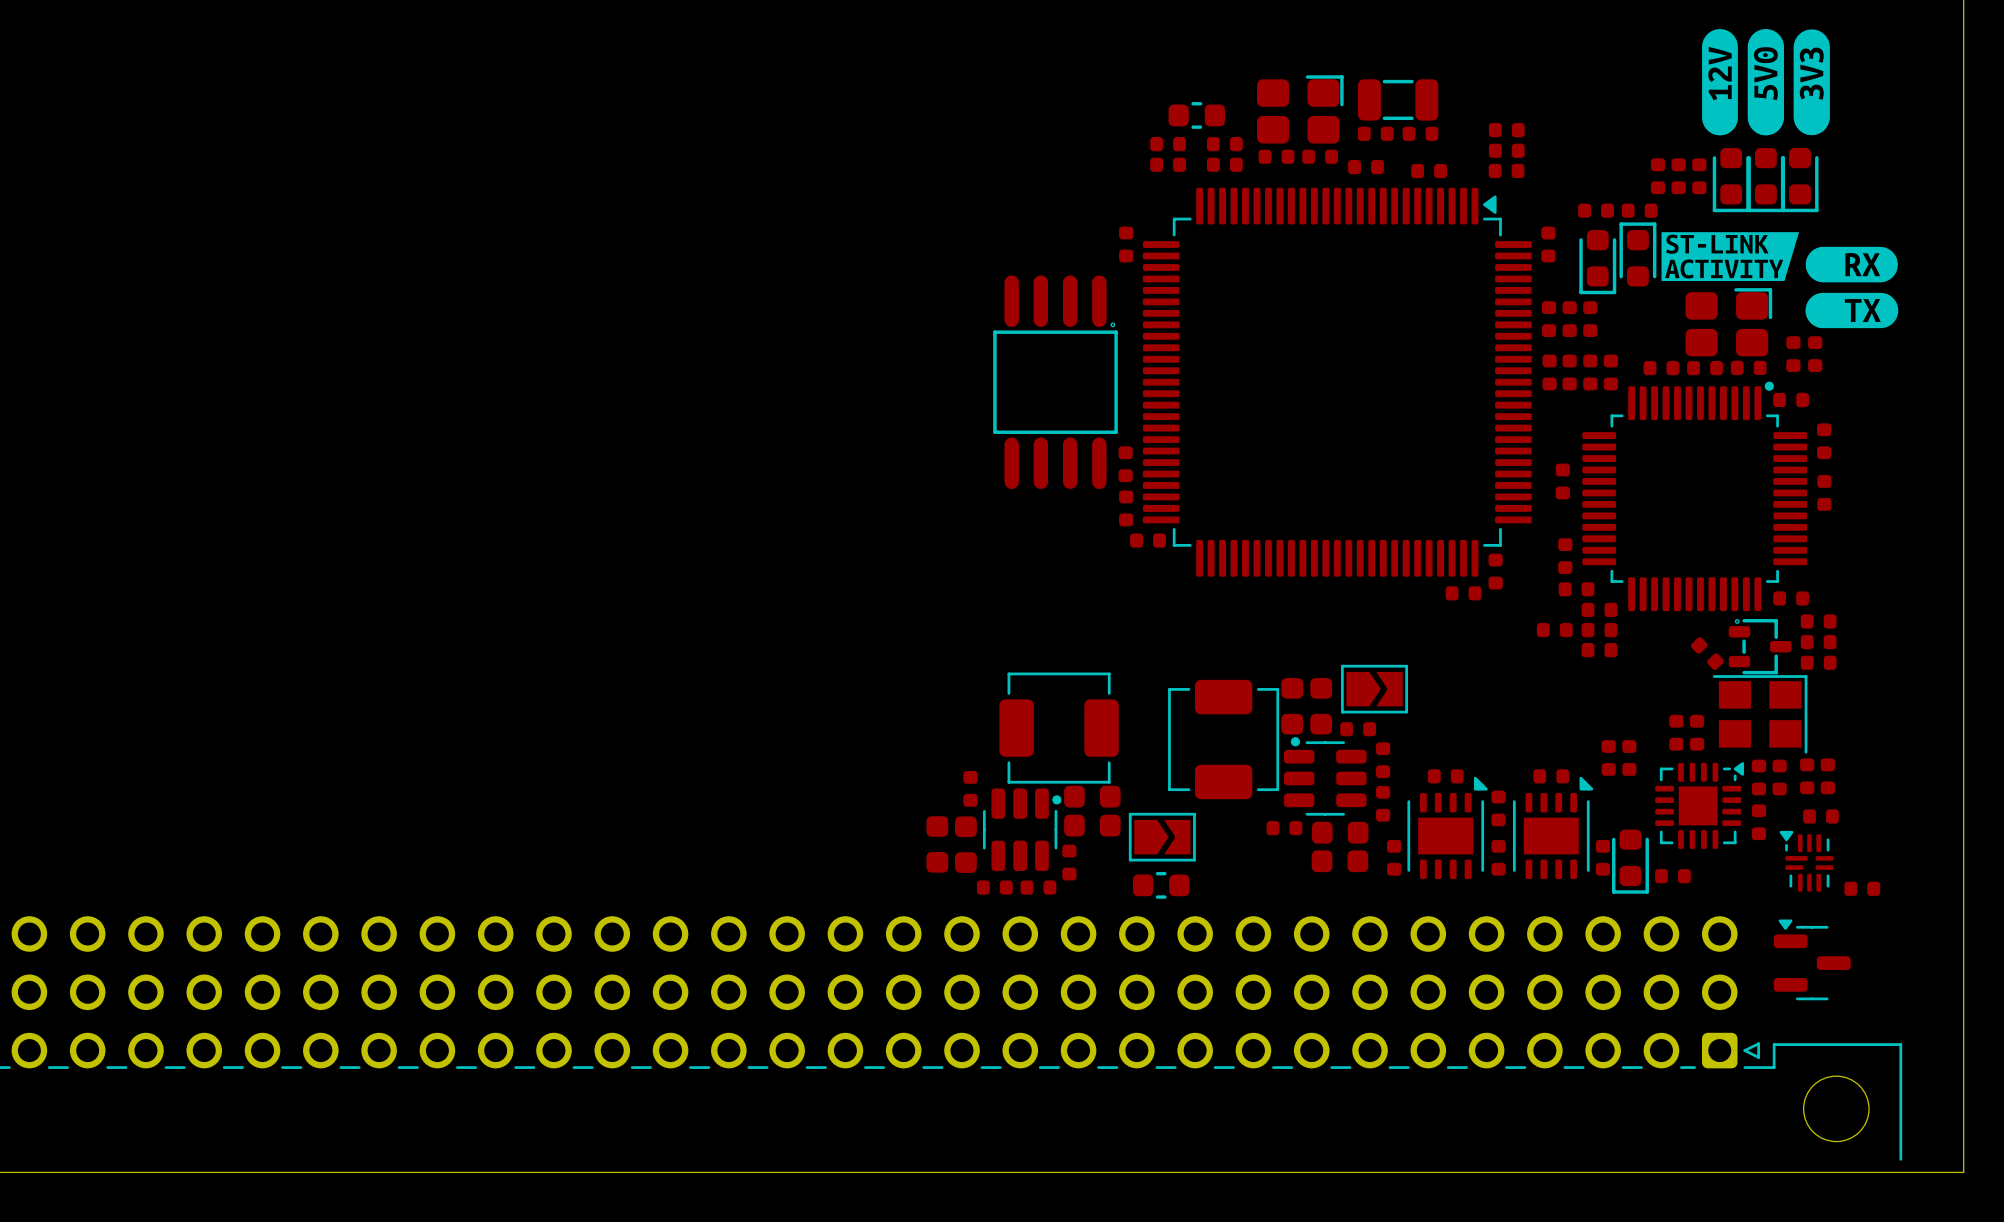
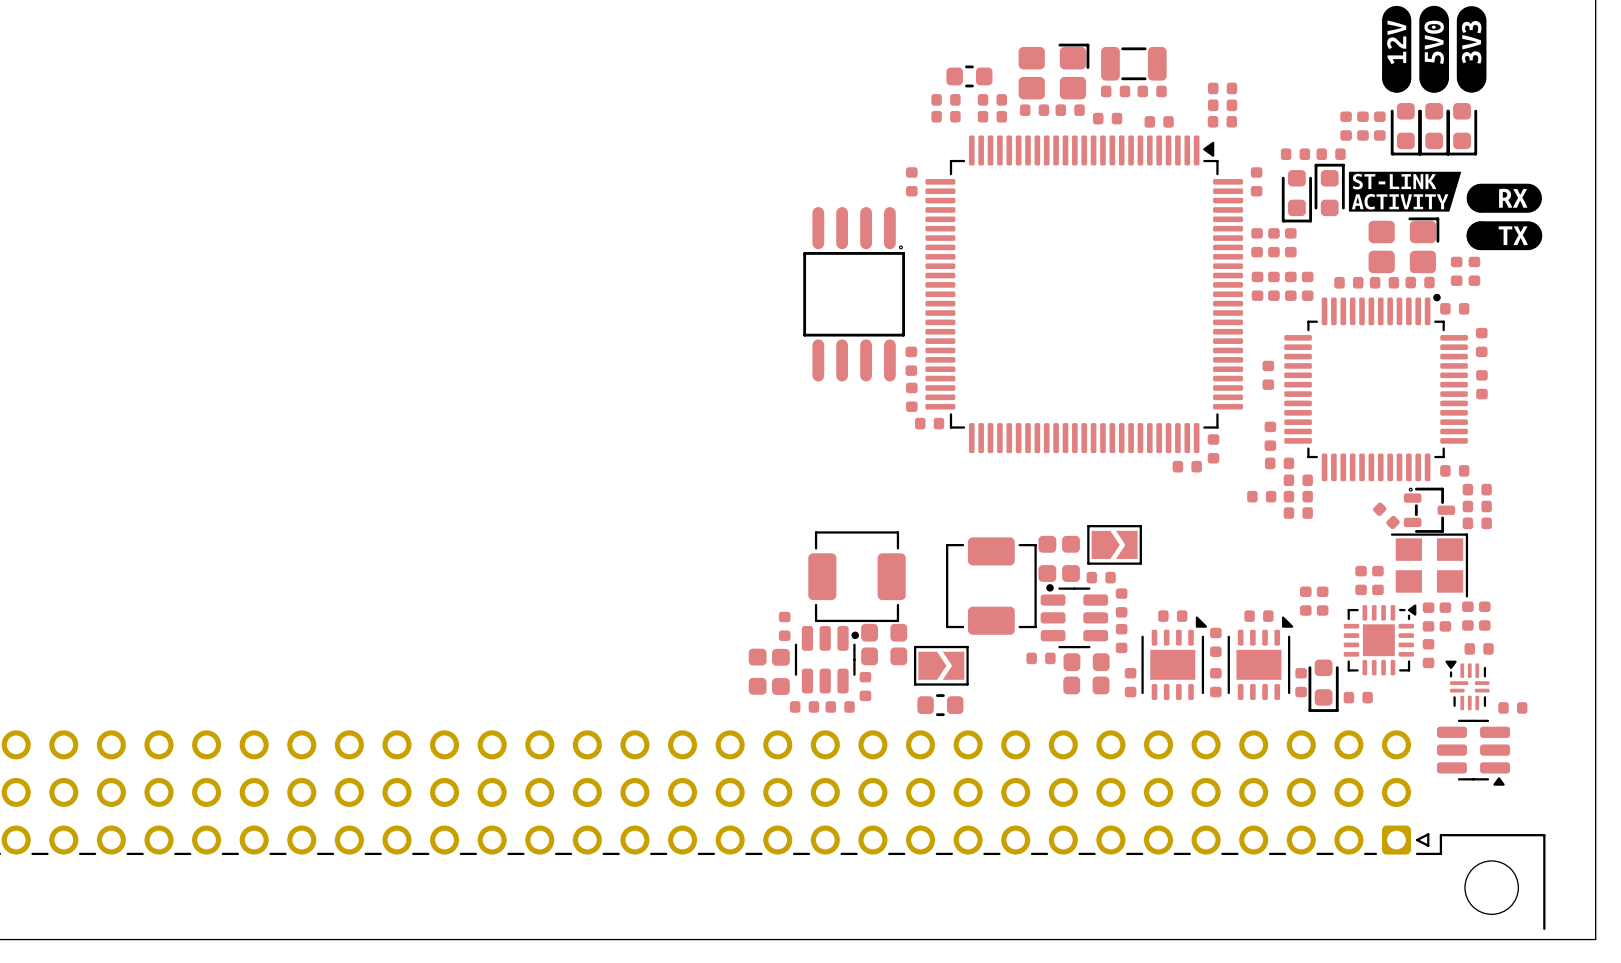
part footprint: [1773, 919, 1851, 1001] -> [1436, 719, 1511, 786]

